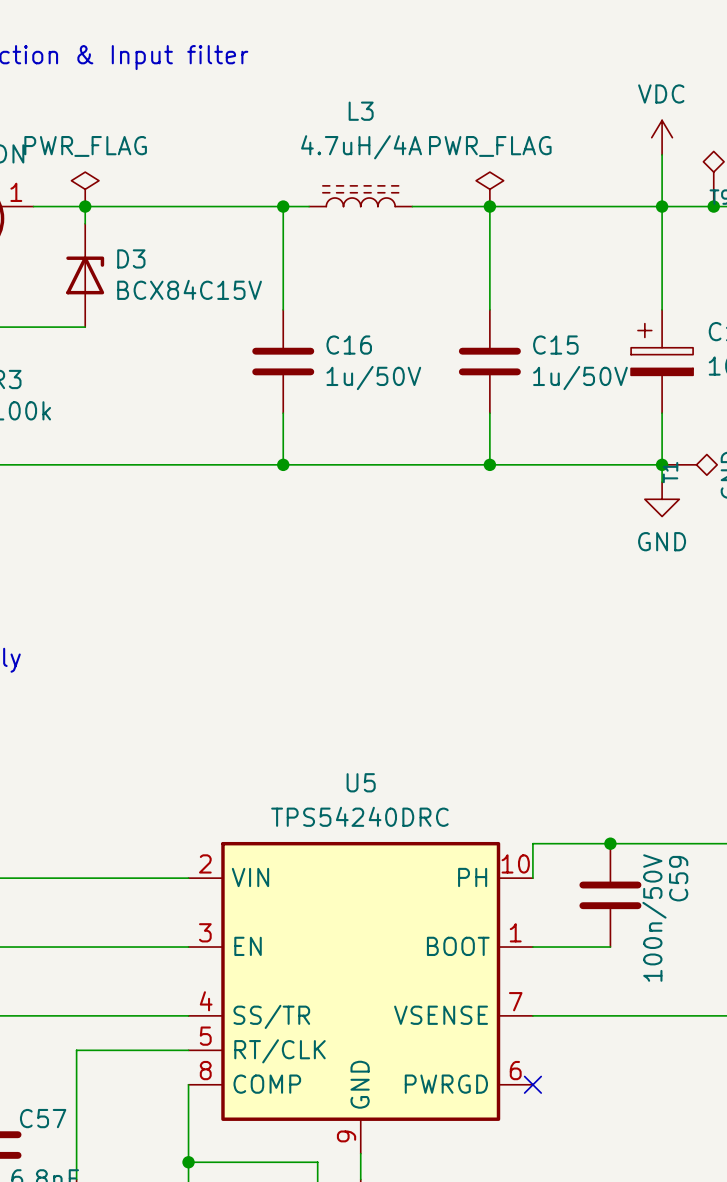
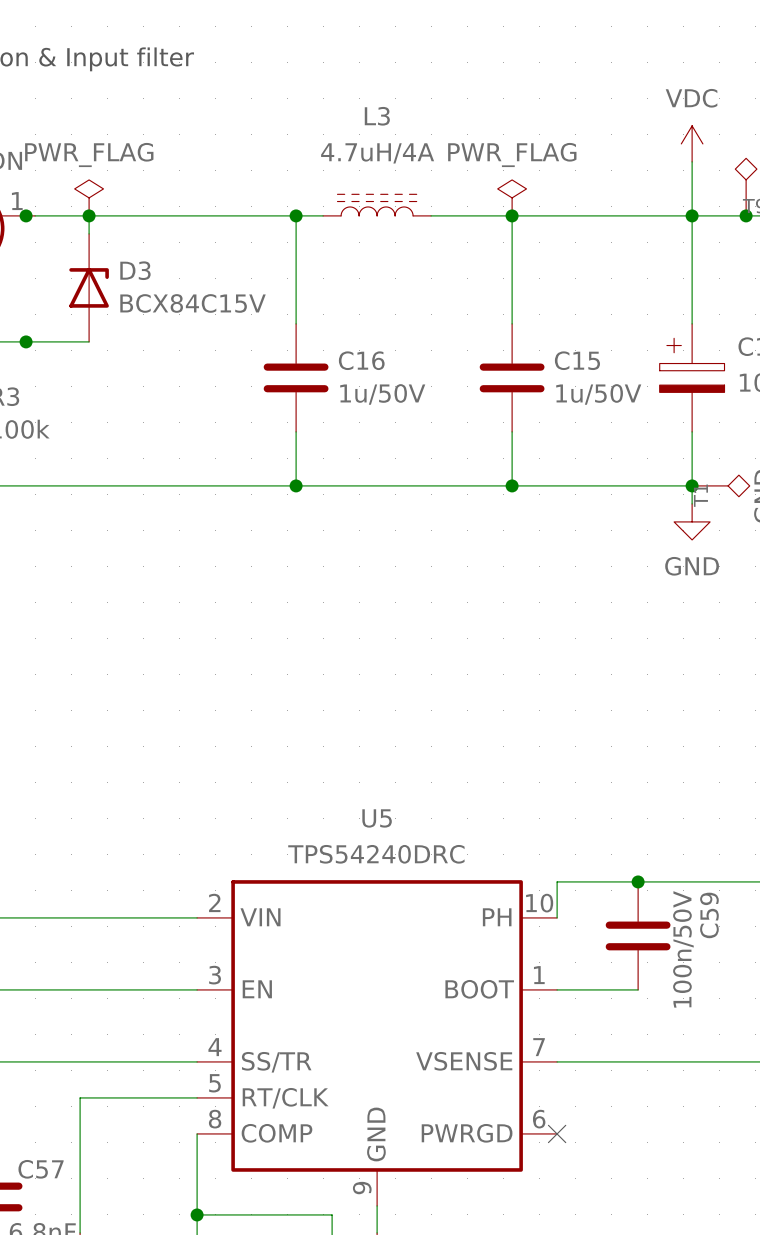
junction: none -> (26, 215)
junction: none -> (26, 341)

